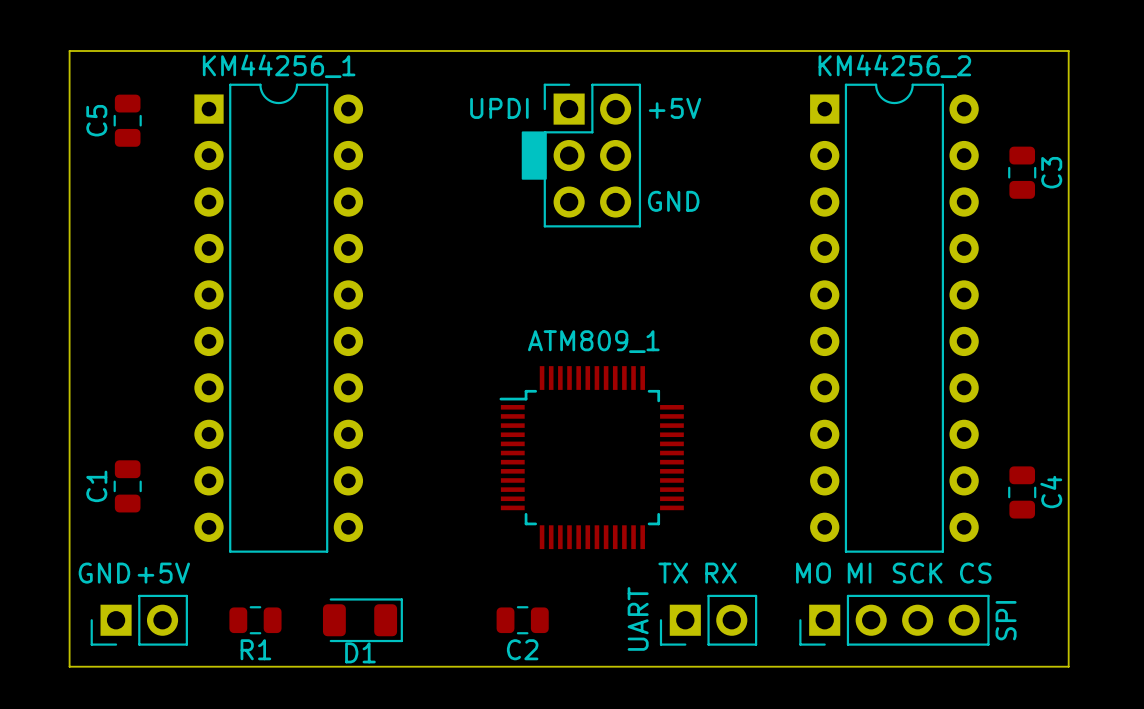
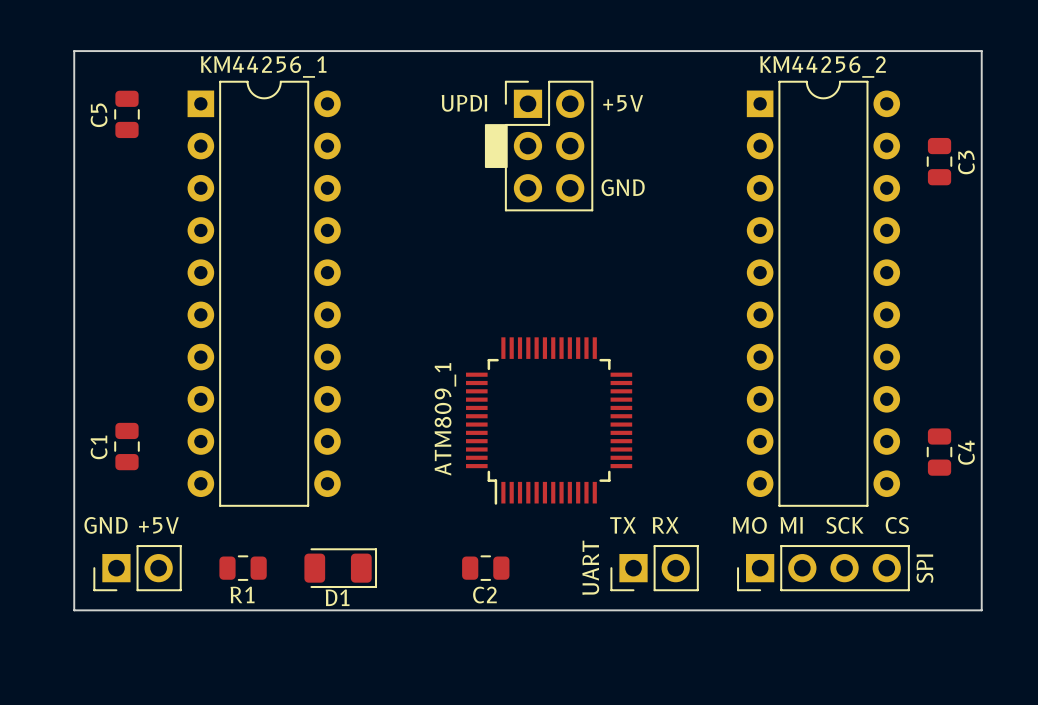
ATM809_1 rotation: 0° (591, 457) -> 90° counterclockwise (549, 421)

